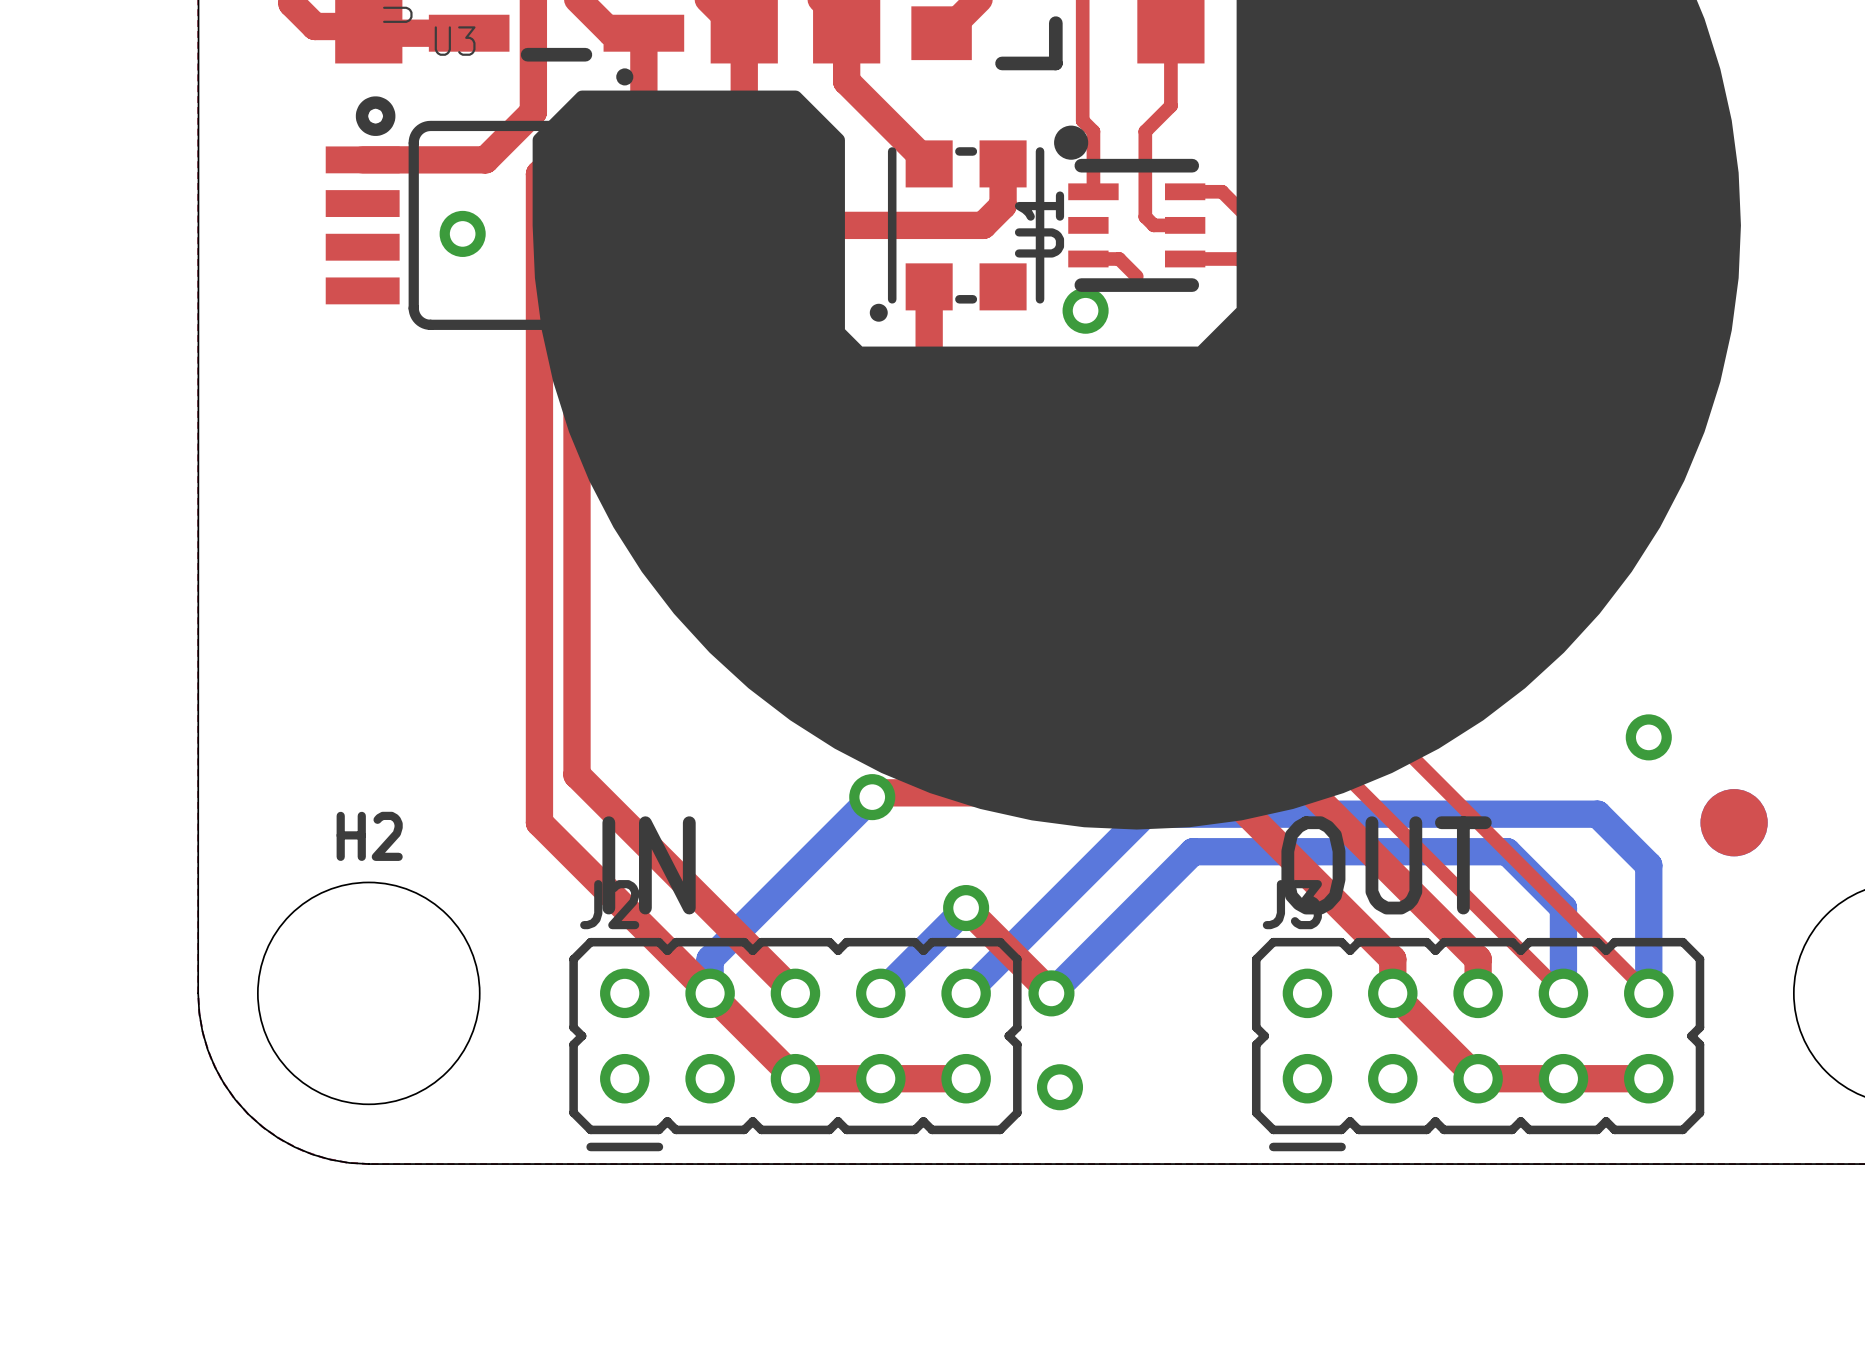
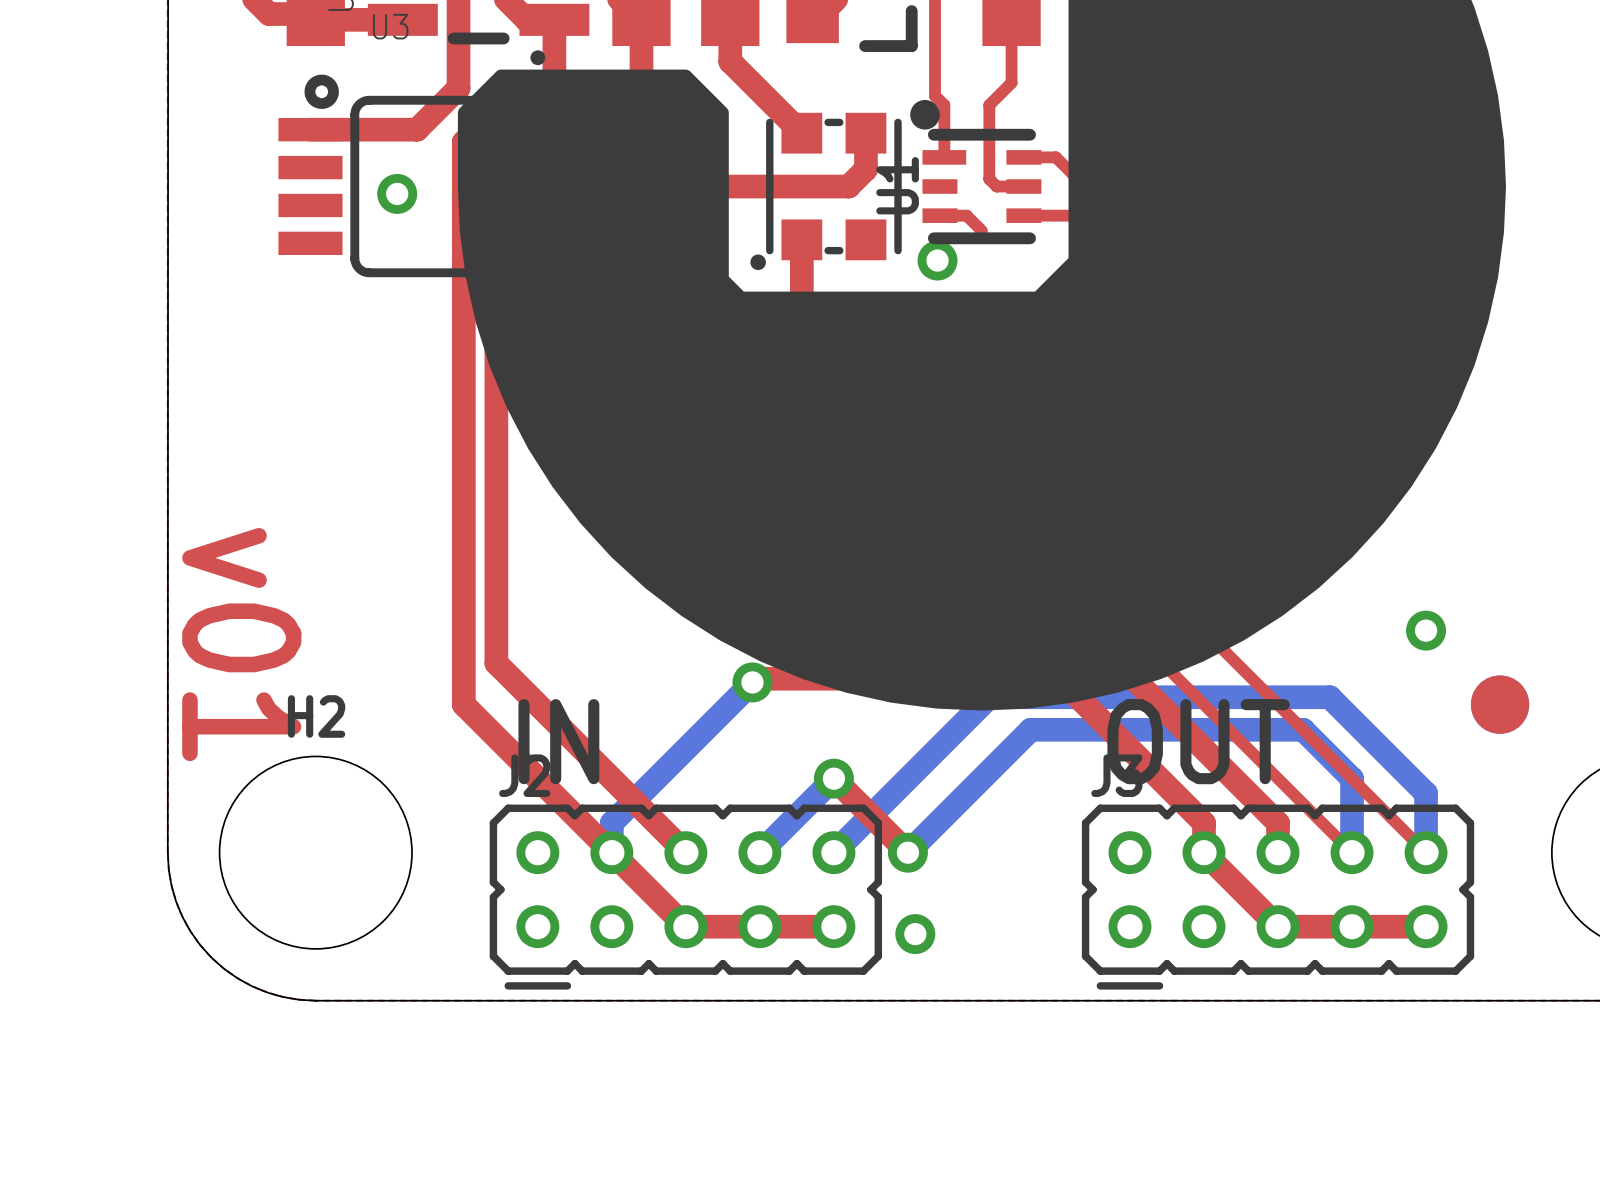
text: none -> v01 (241, 644)
bottom track: (1537, 814) (1597, 814) (1648, 865) (1648, 925) -> (1329, 697) (1426, 793)

